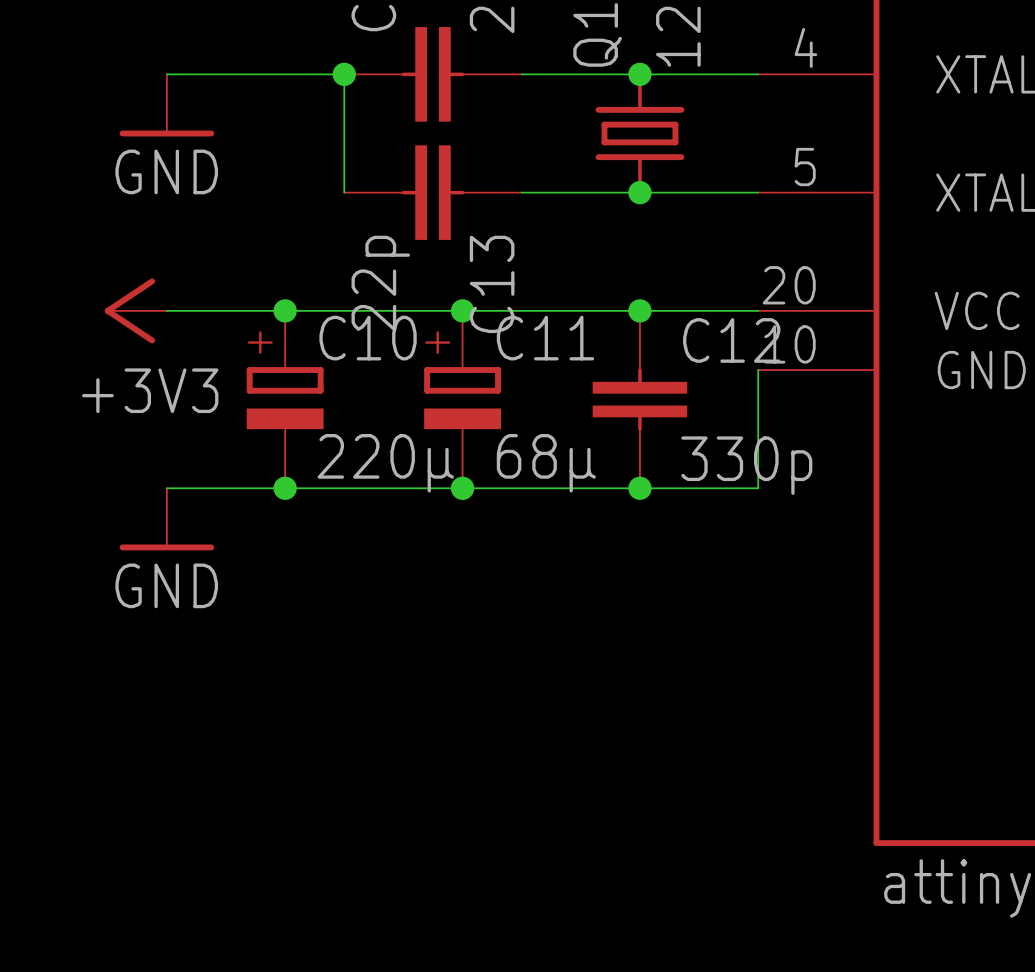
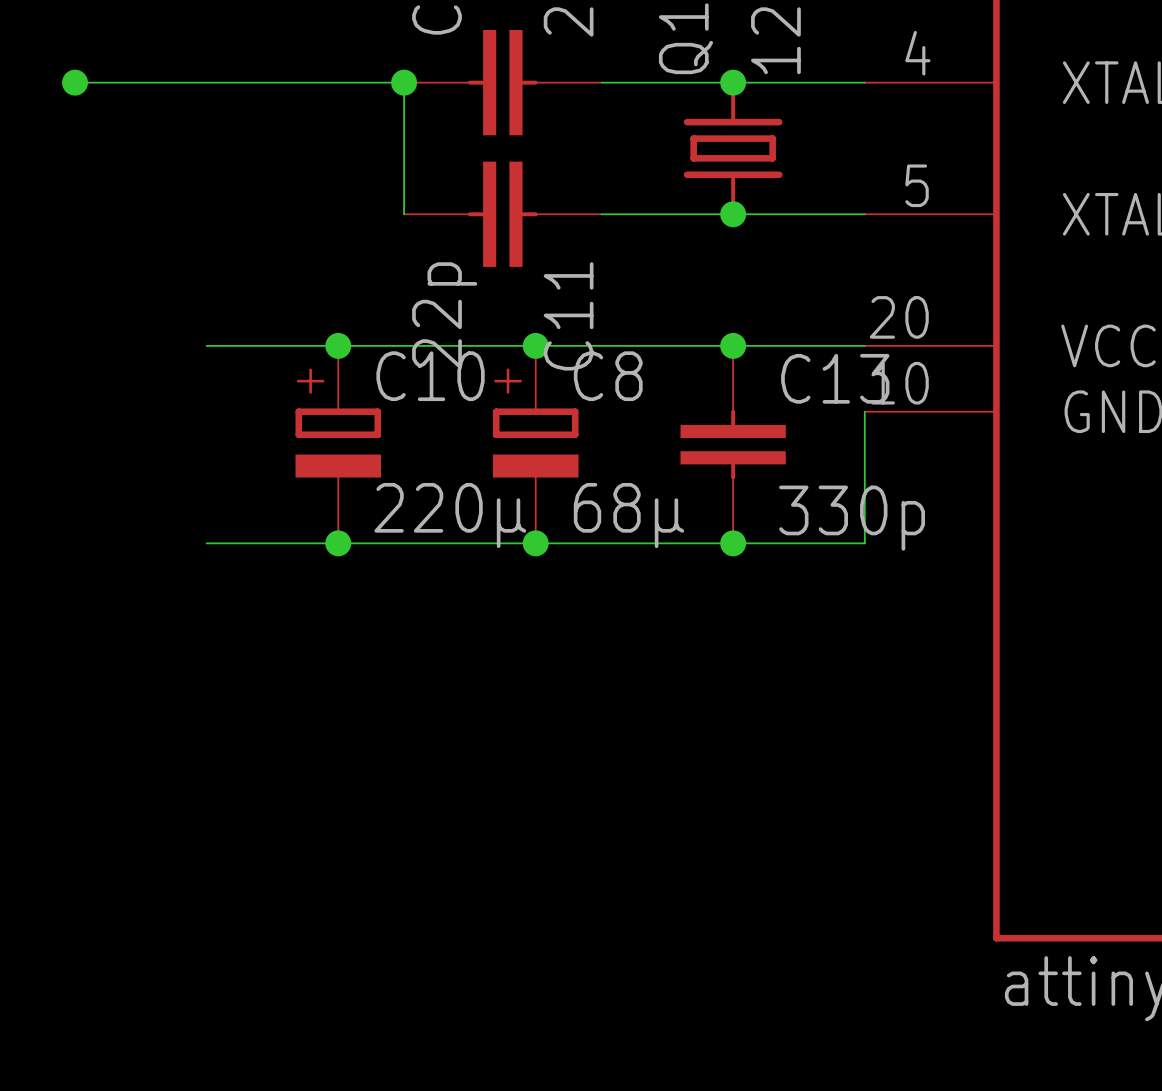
wire: none -> (75, 82) (206, 82)
junction: none -> (75, 82)
power symbol: GND (166, 105) -> none
C13 name: C13 (492, 284) -> C11 (568, 316)
power symbol: +3V3 (135, 310) -> none
C11 name: C11 (545, 338) -> C8 (608, 376)
C12 name: C12 (731, 340) -> C13 (835, 378)
power symbol: GND (166, 519) -> none

